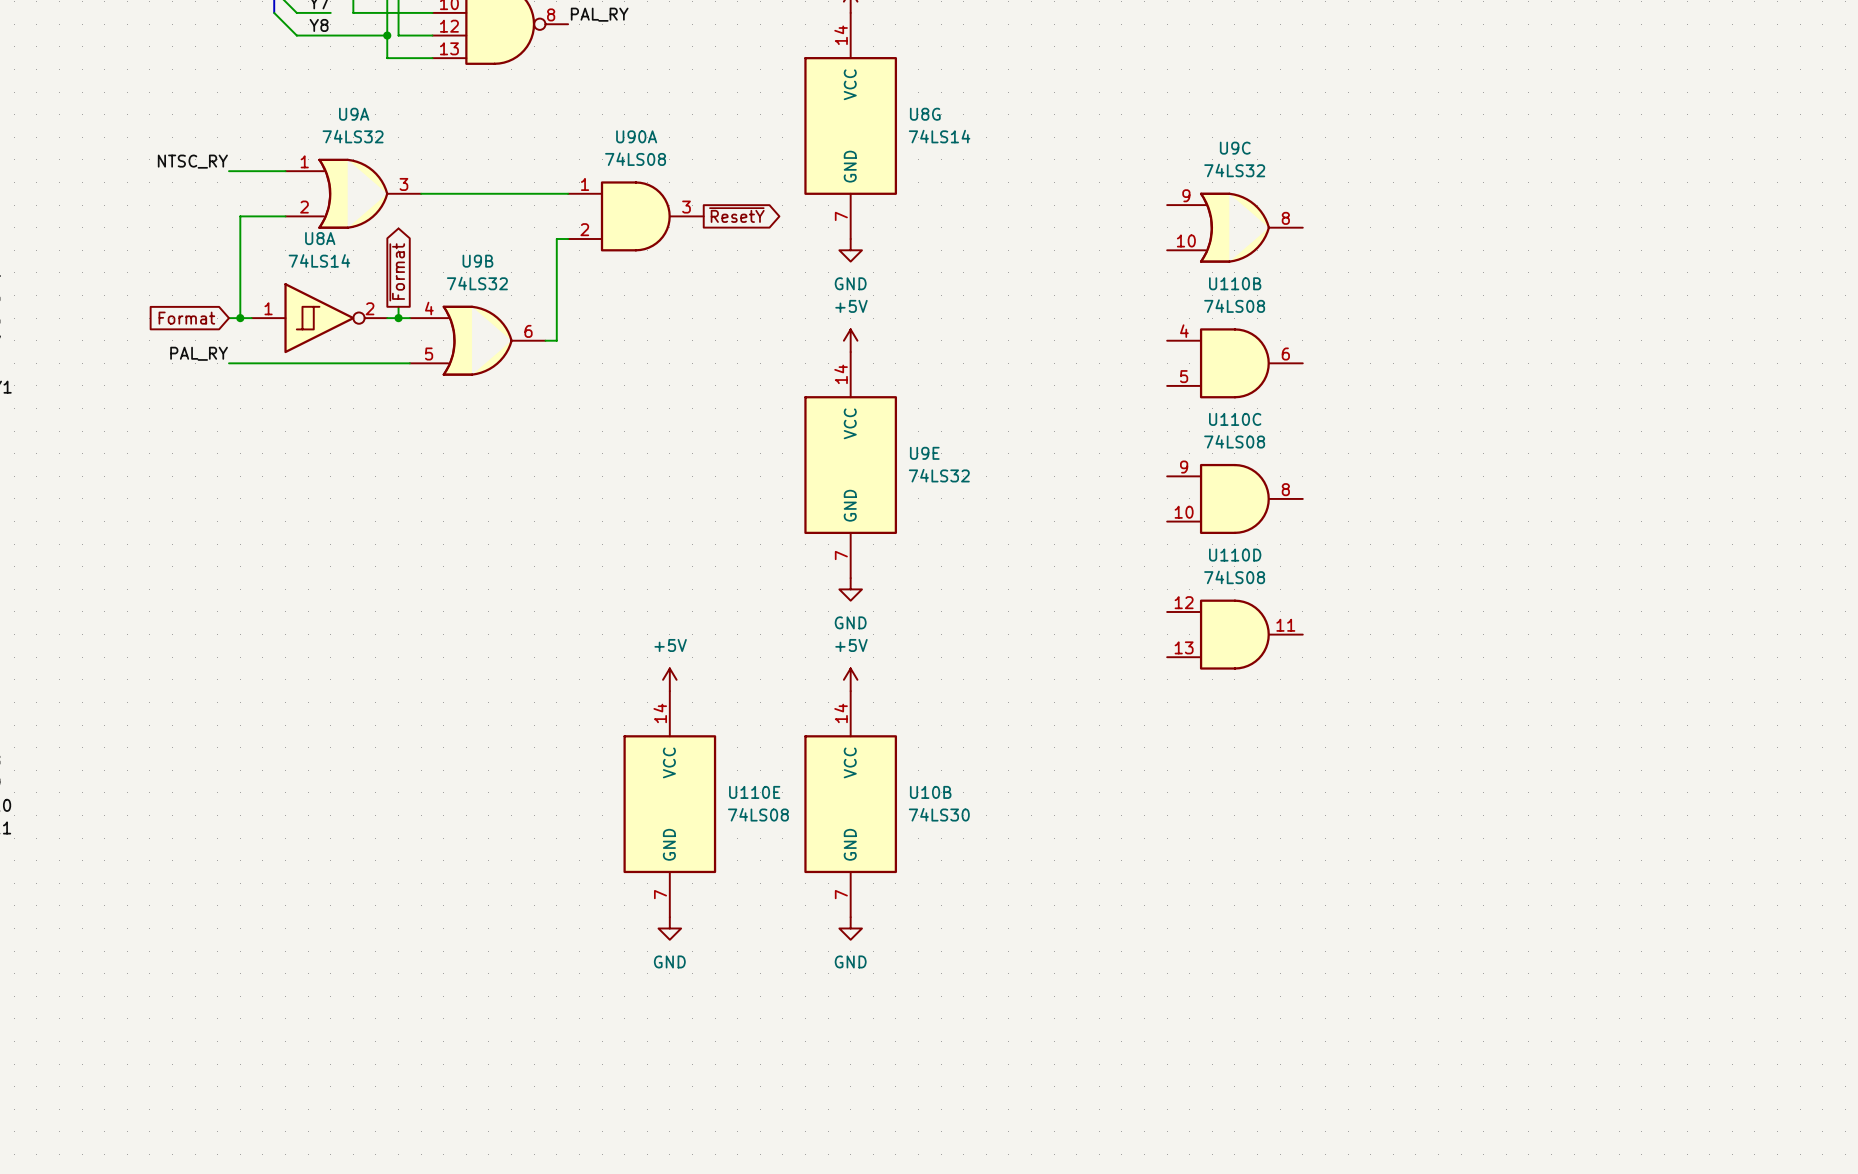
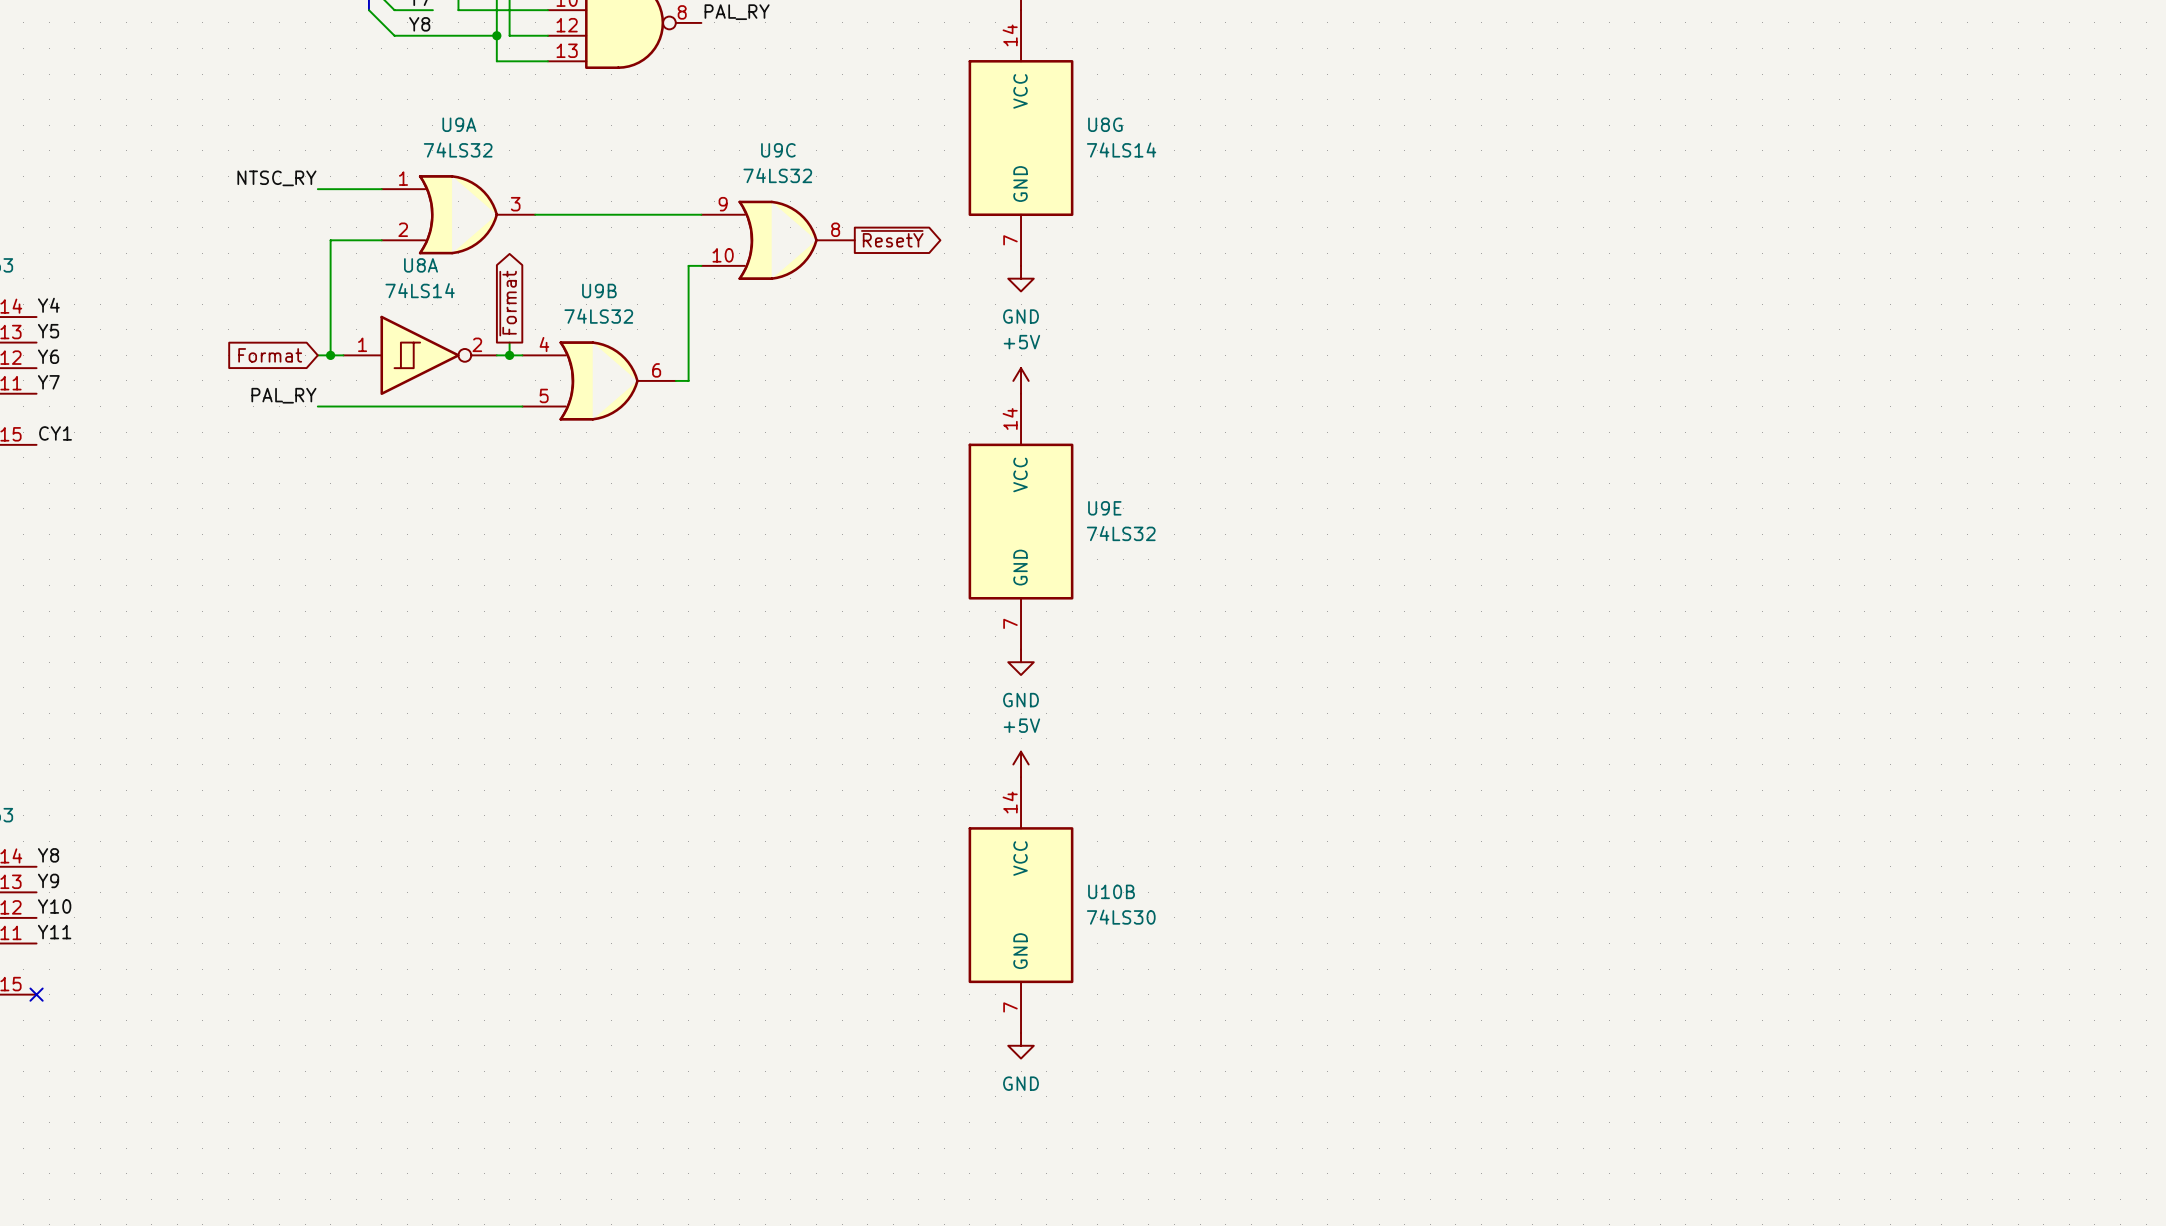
U90A: 74LS08 (635, 216) -> none
U9C position: (1234, 227) -> (778, 240)
U110B: 74LS08 (1234, 363) -> none
U110C: 74LS08 (1234, 498) -> none
U110D: 74LS08 (1234, 634) -> none
power symbol: +5V (669, 679) -> none
U110E: 74LS08 (669, 804) -> none
power symbol: GND (669, 928) -> none

